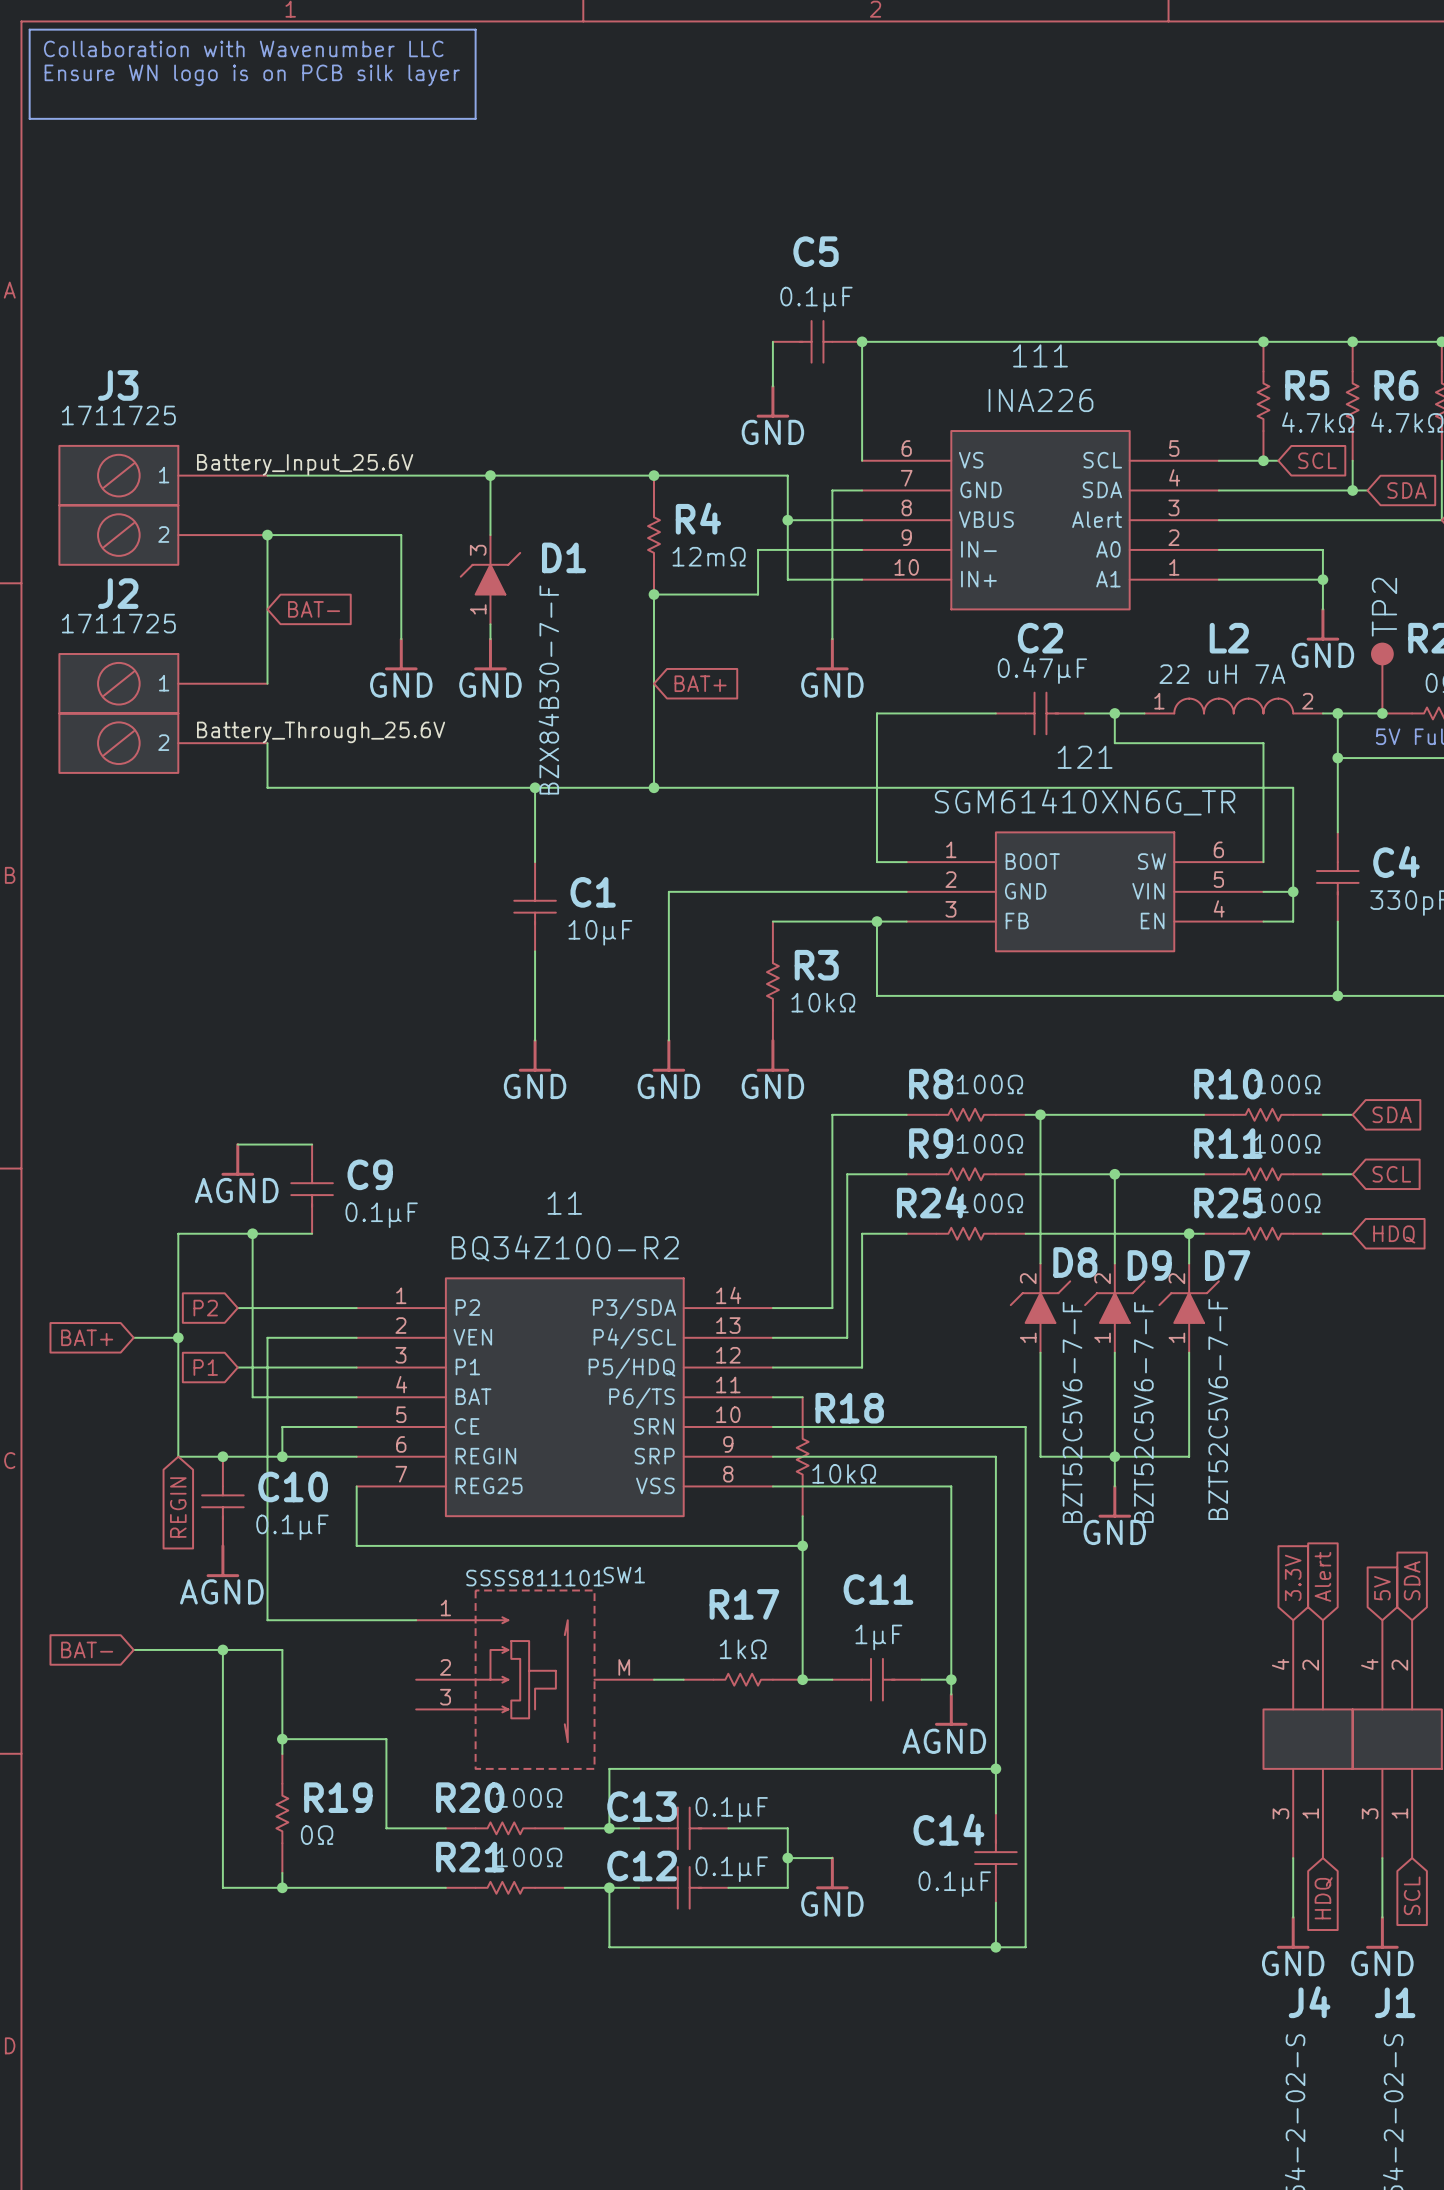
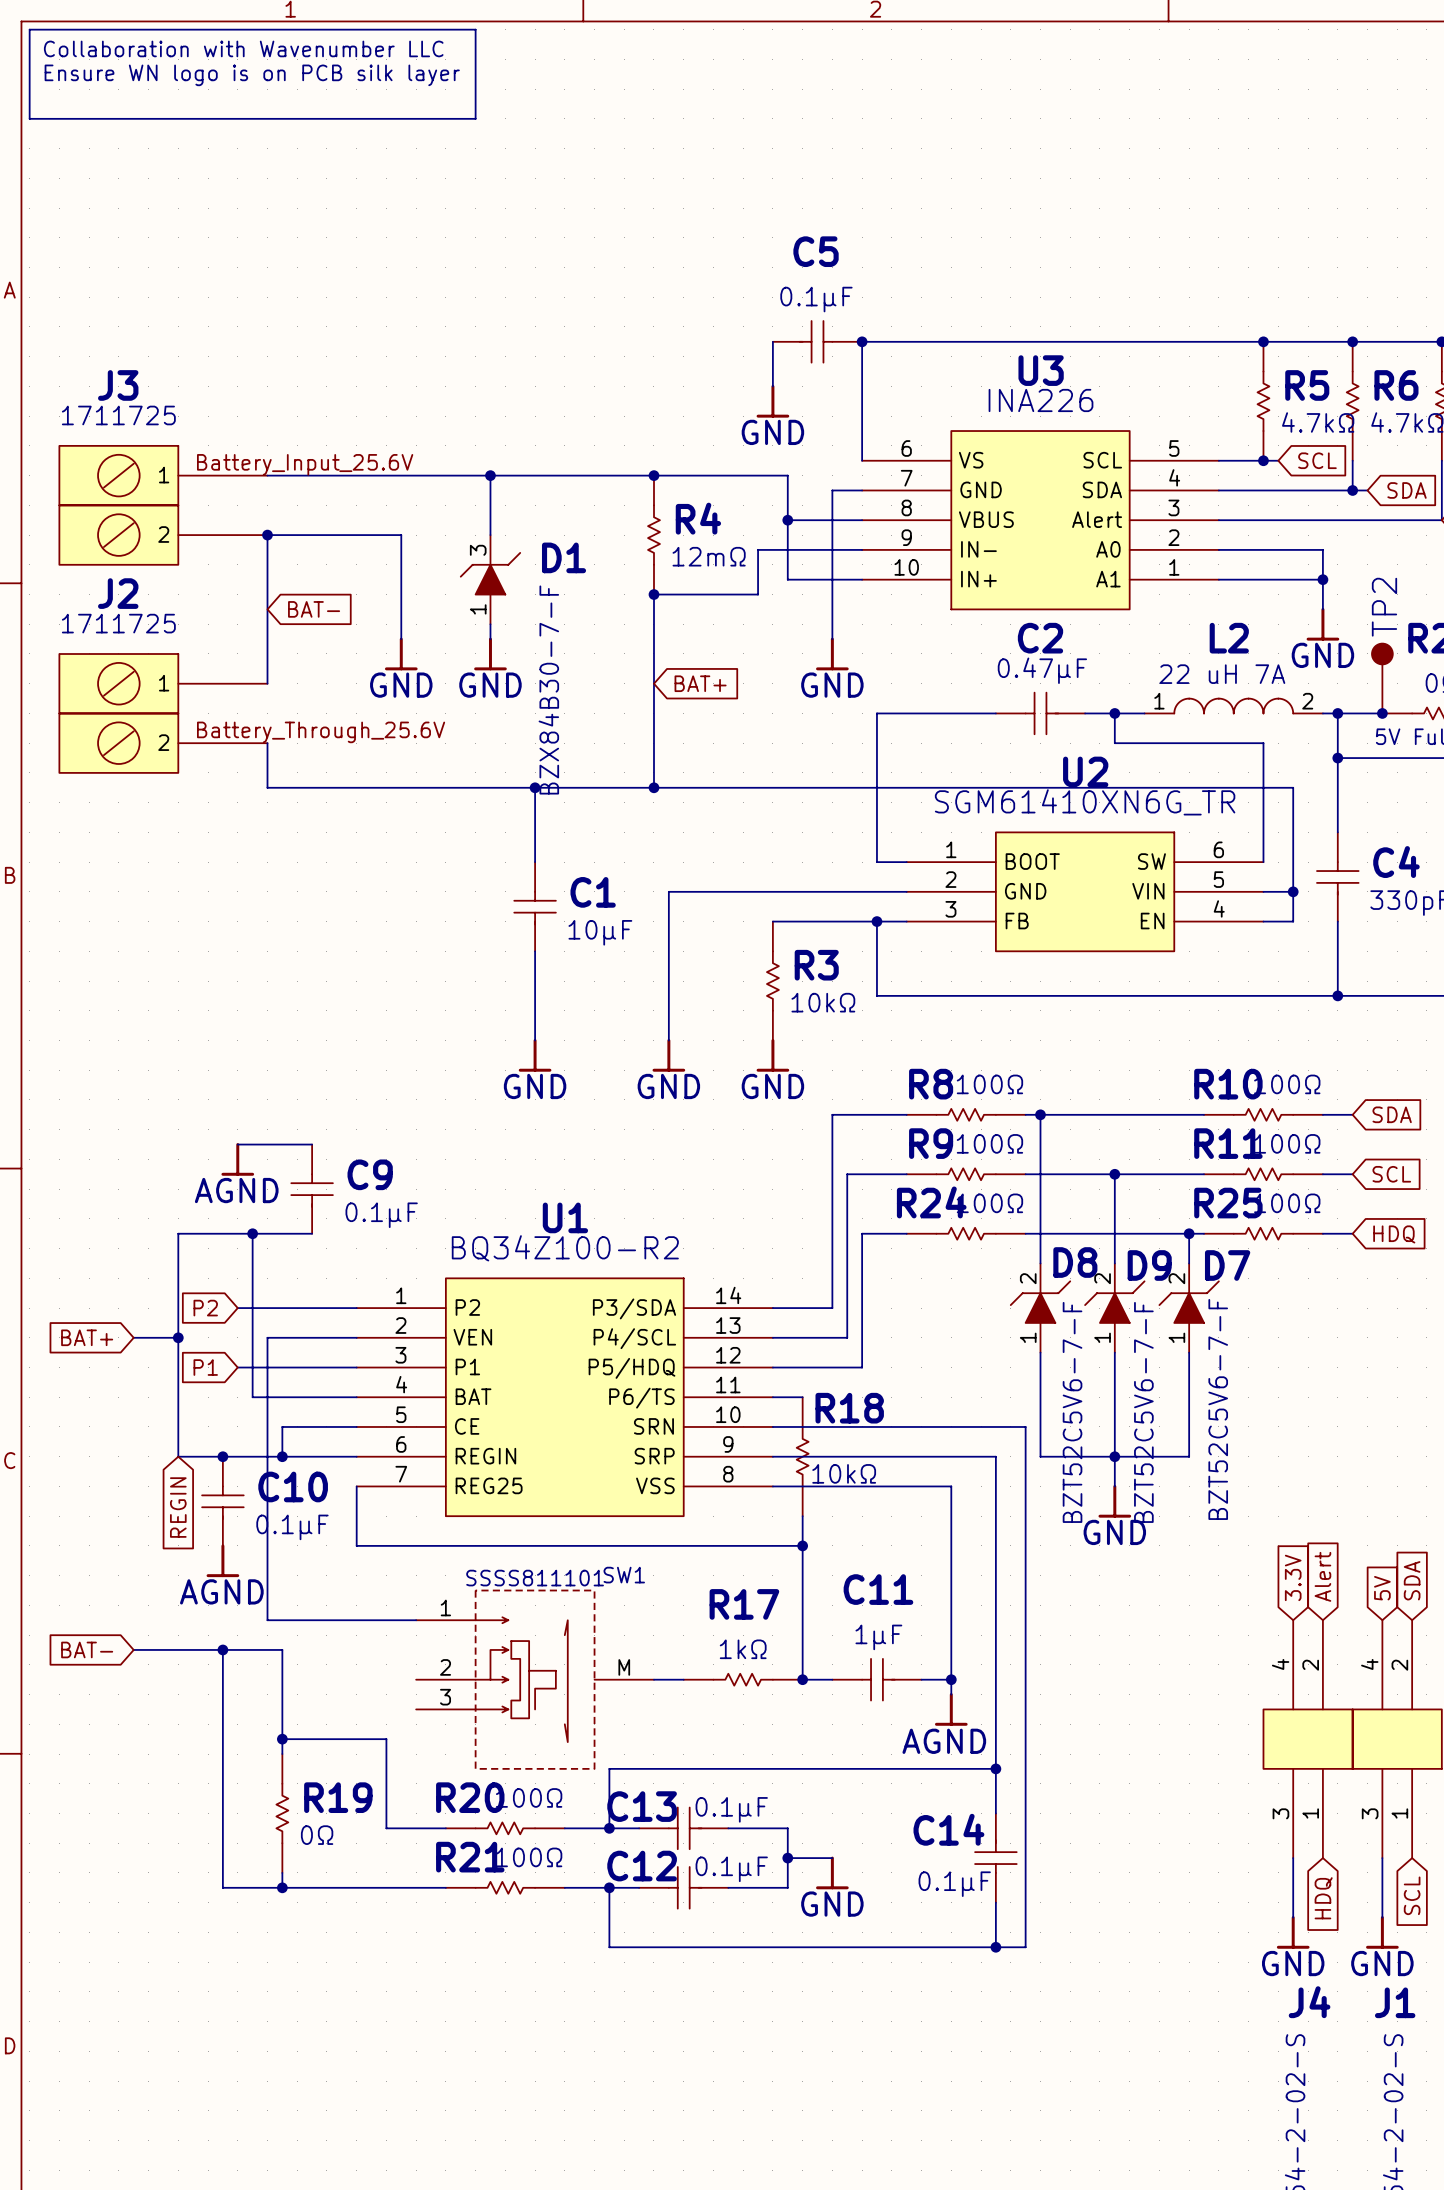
111 name: 111 (1040, 355) -> U3 (1041, 370)
121 name: 121 (1085, 757) -> U2 (1085, 771)
11 name: 11 (564, 1203) -> U1 (565, 1217)

